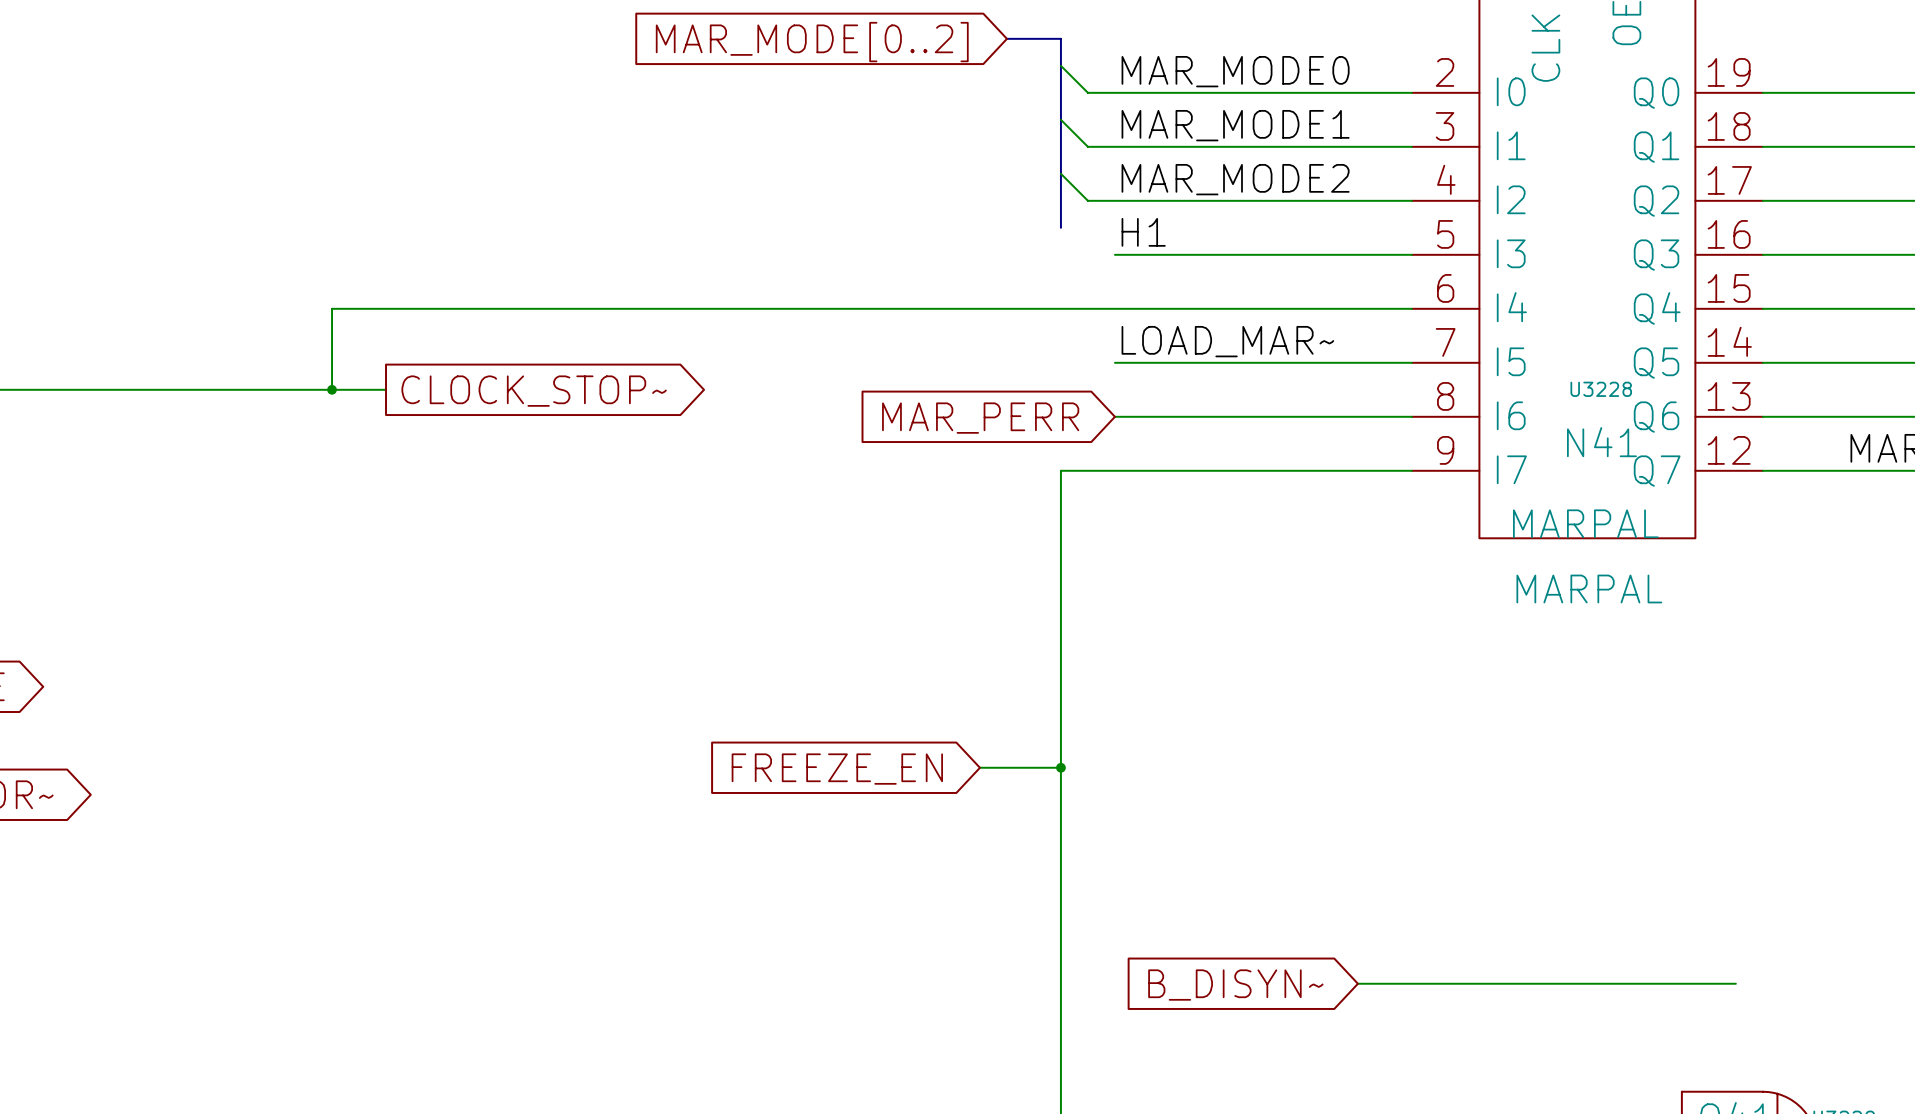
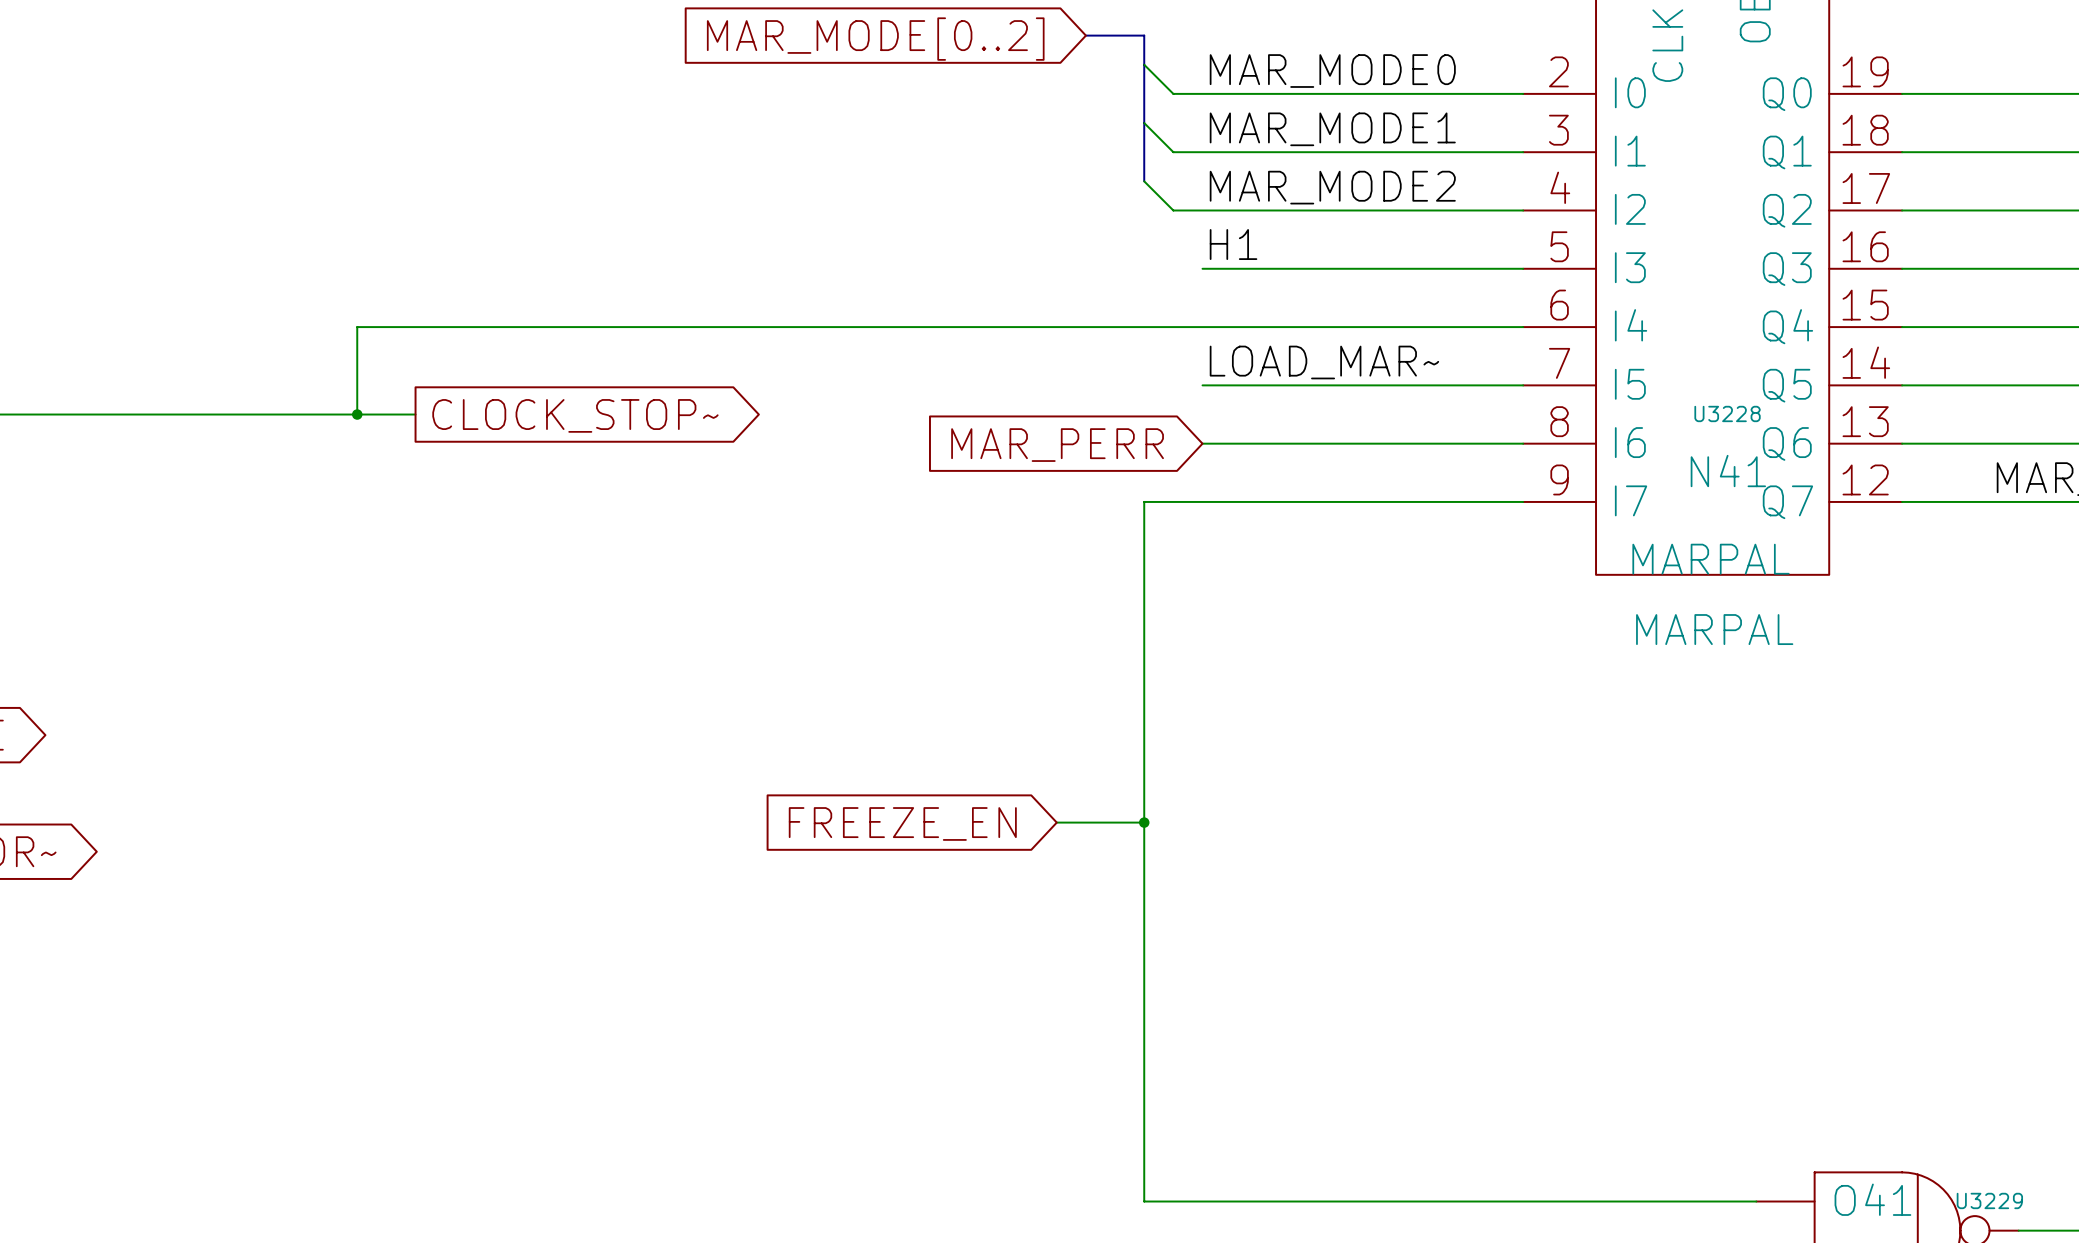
bus: (1060, 173) (1060, 227) -> none
wire: (1357, 983) (1735, 983) -> none
global label: B_DISYN~ (1235, 985) -> none

